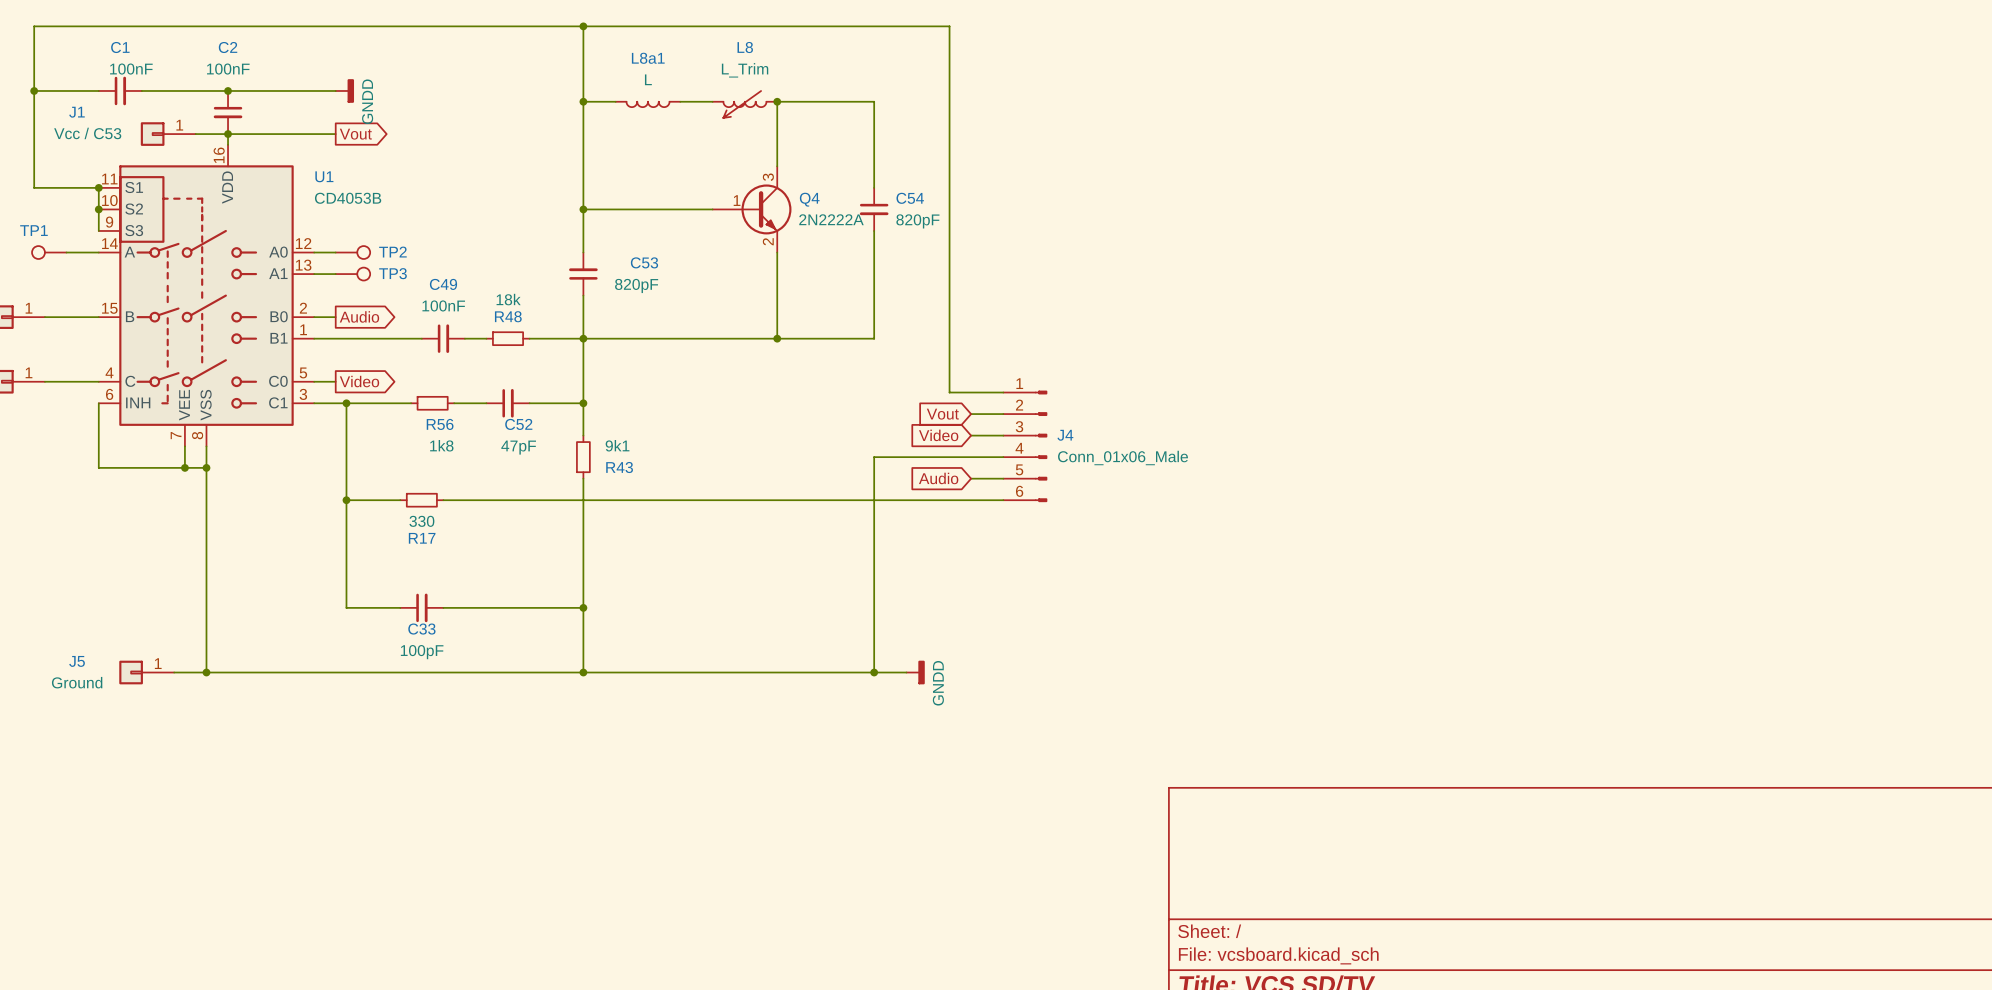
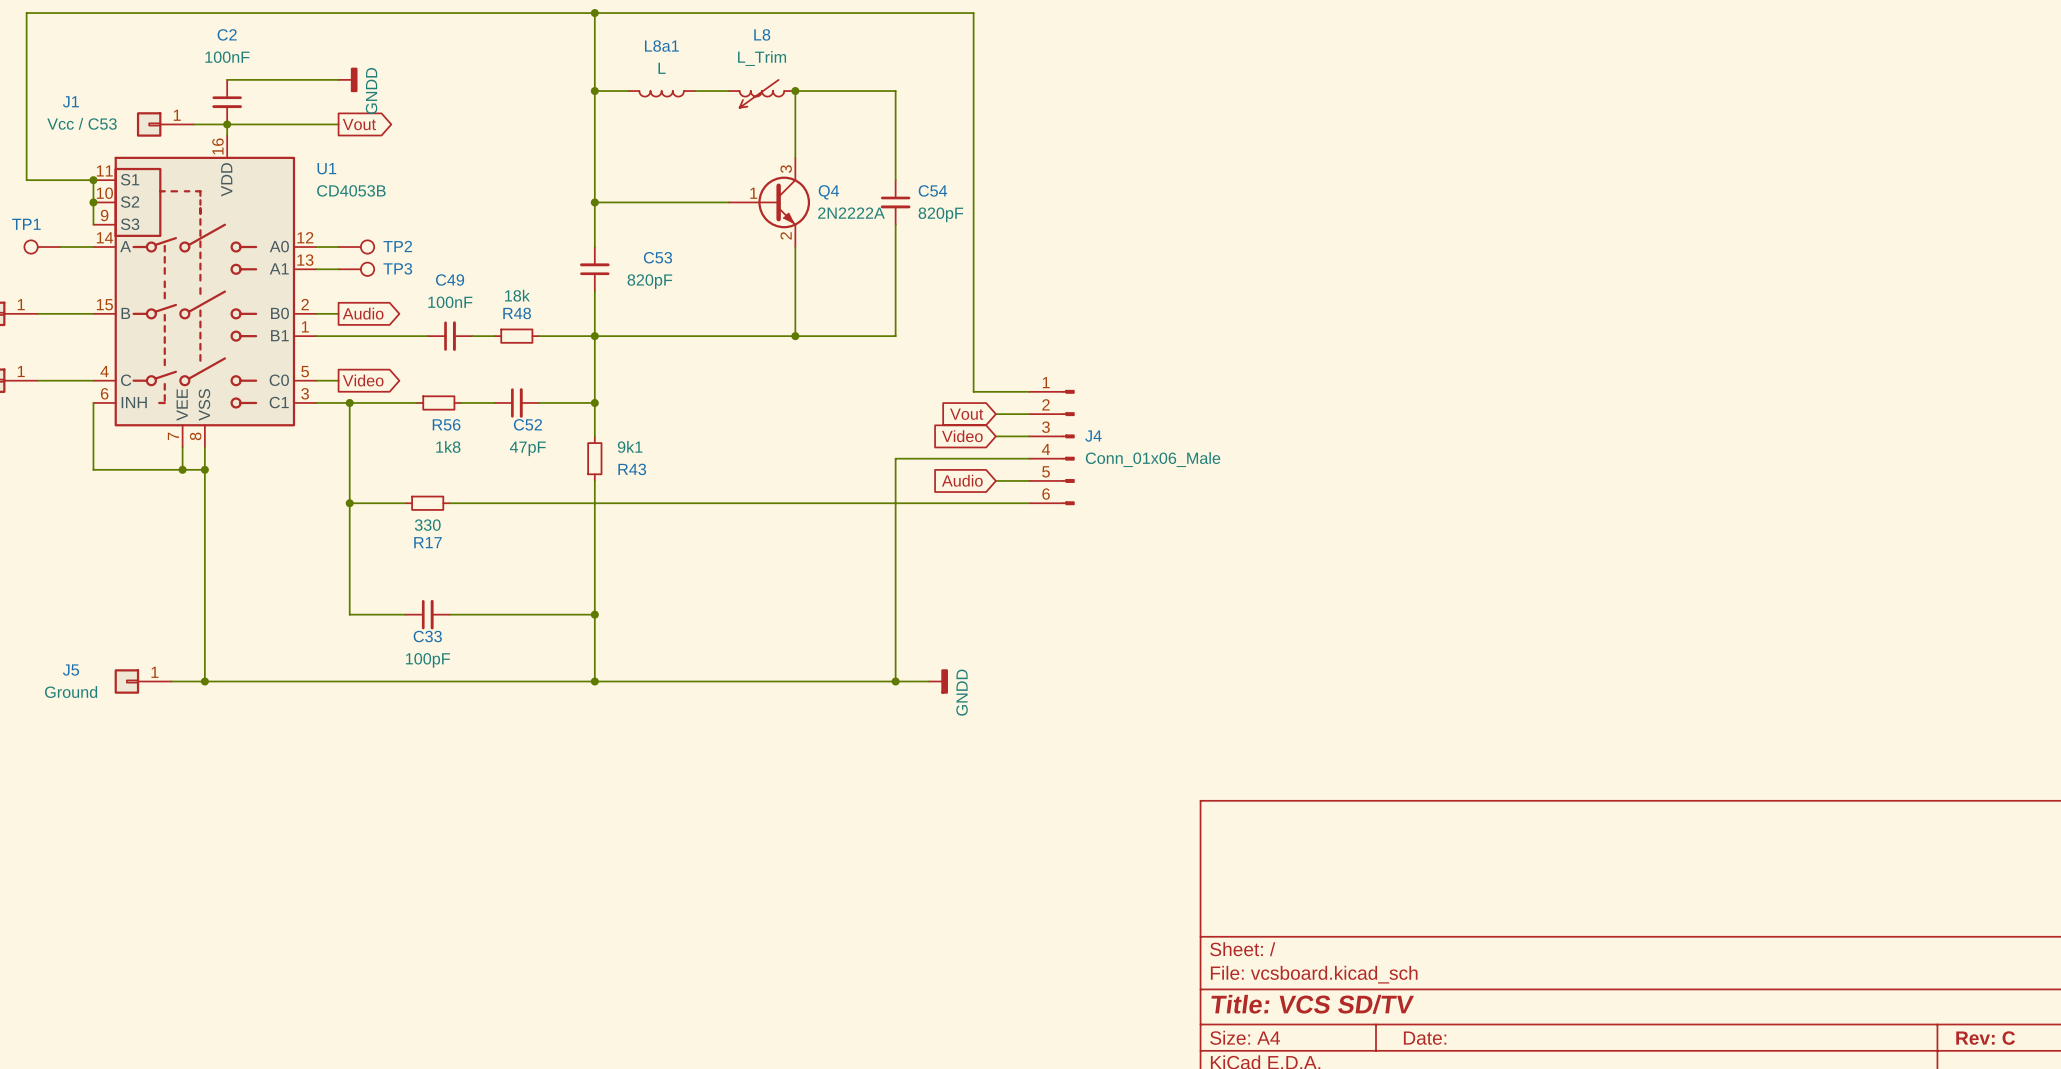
wire: (34, 90) (98, 90) -> none
junction: (34, 90) -> none
C1: 100nF (120, 90) -> none
wire: (141, 90) (228, 90) -> none
junction: (228, 90) -> none

